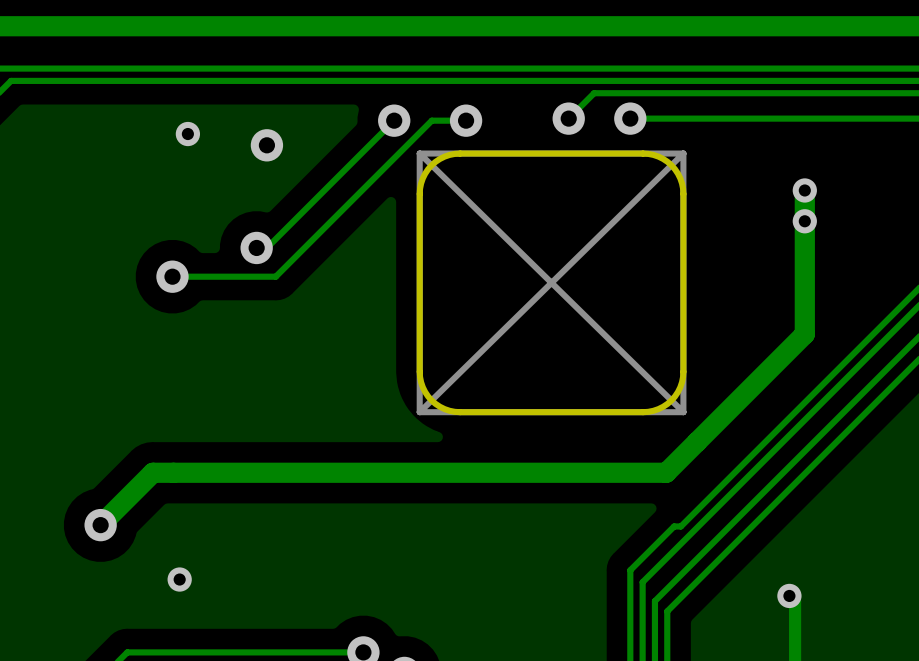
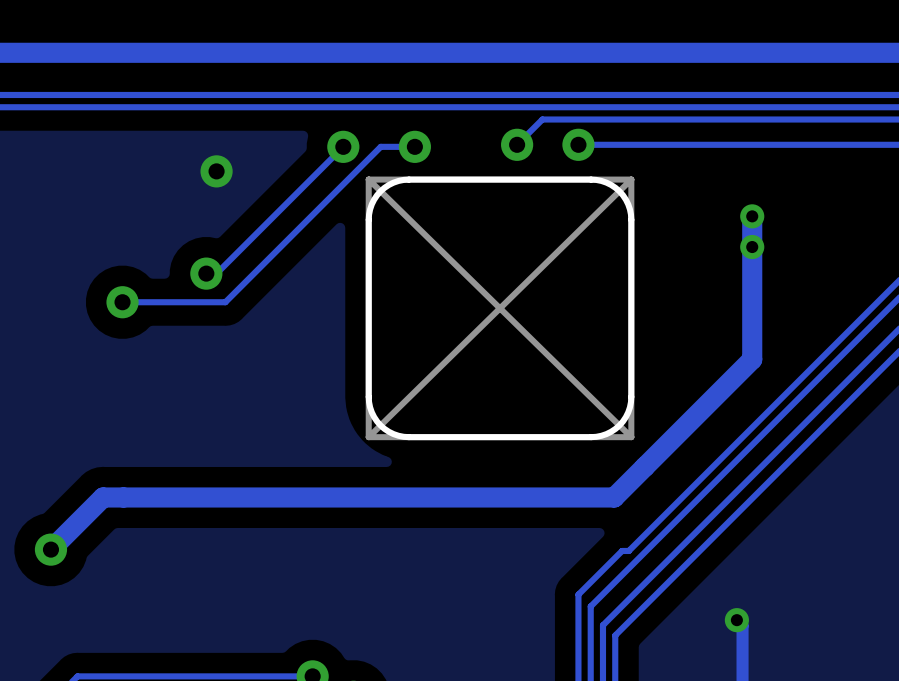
via: (187, 134) -> none
via: (179, 579) -> none

